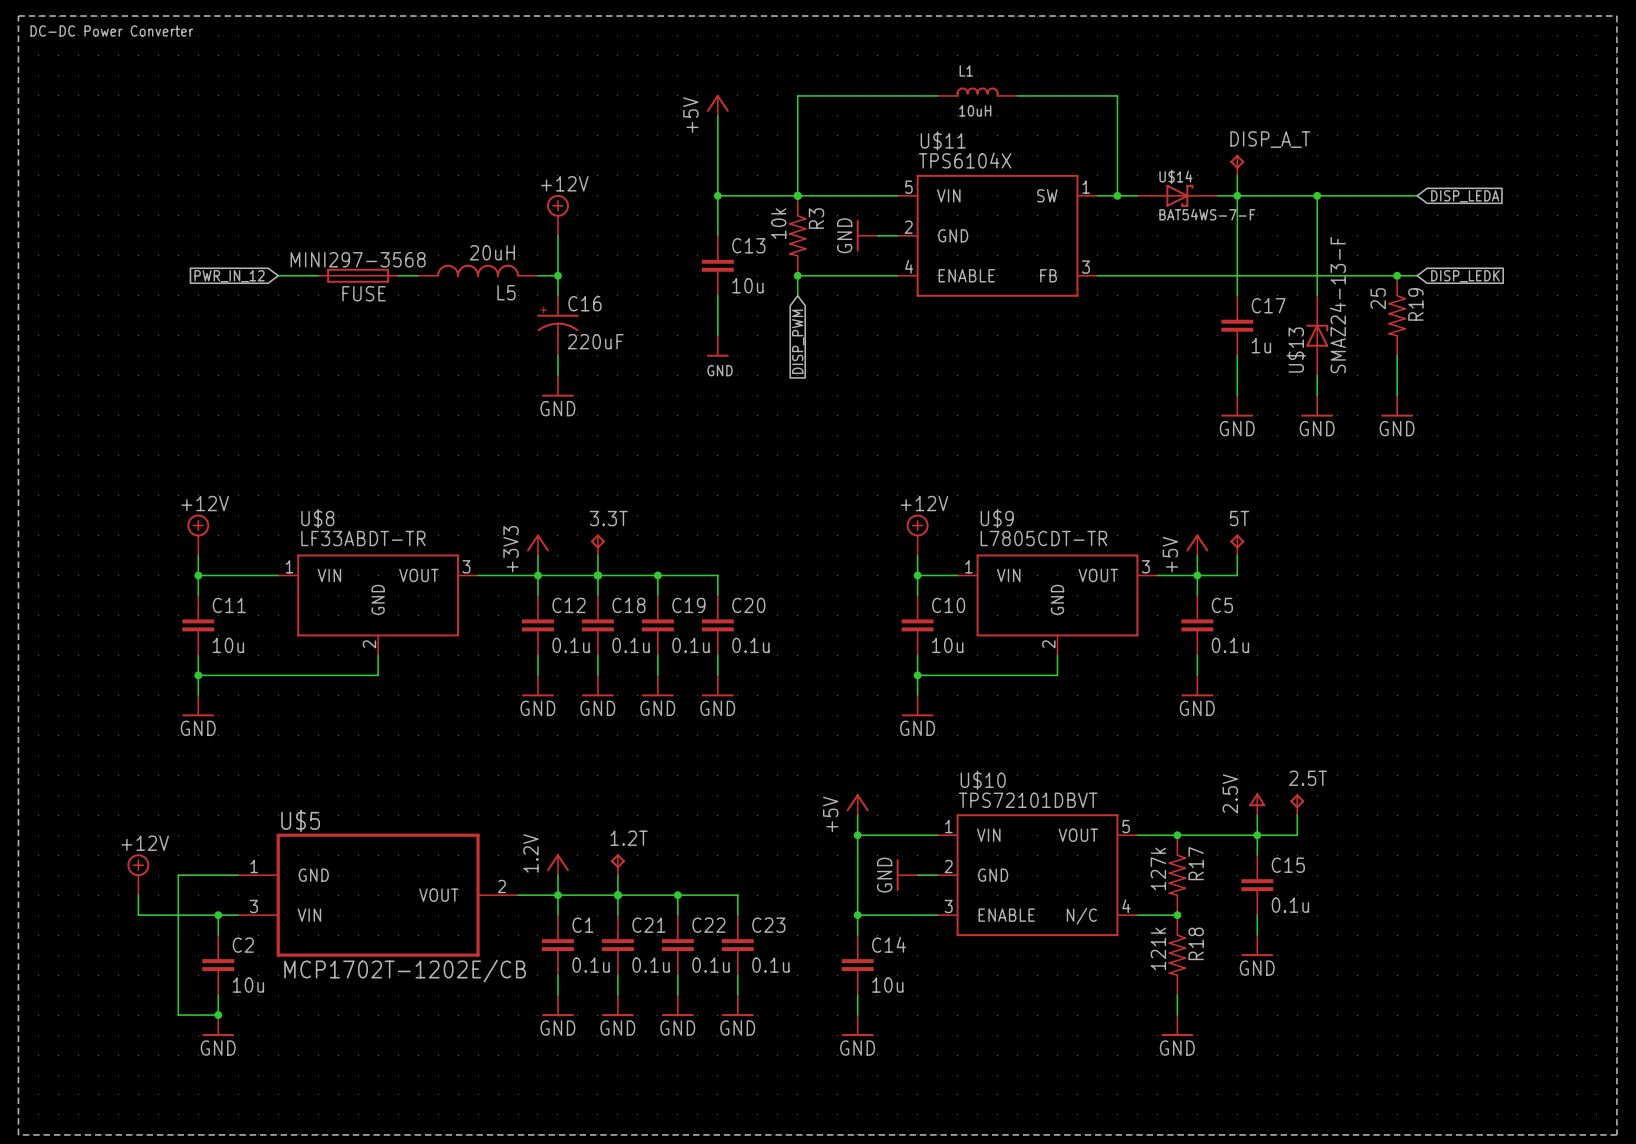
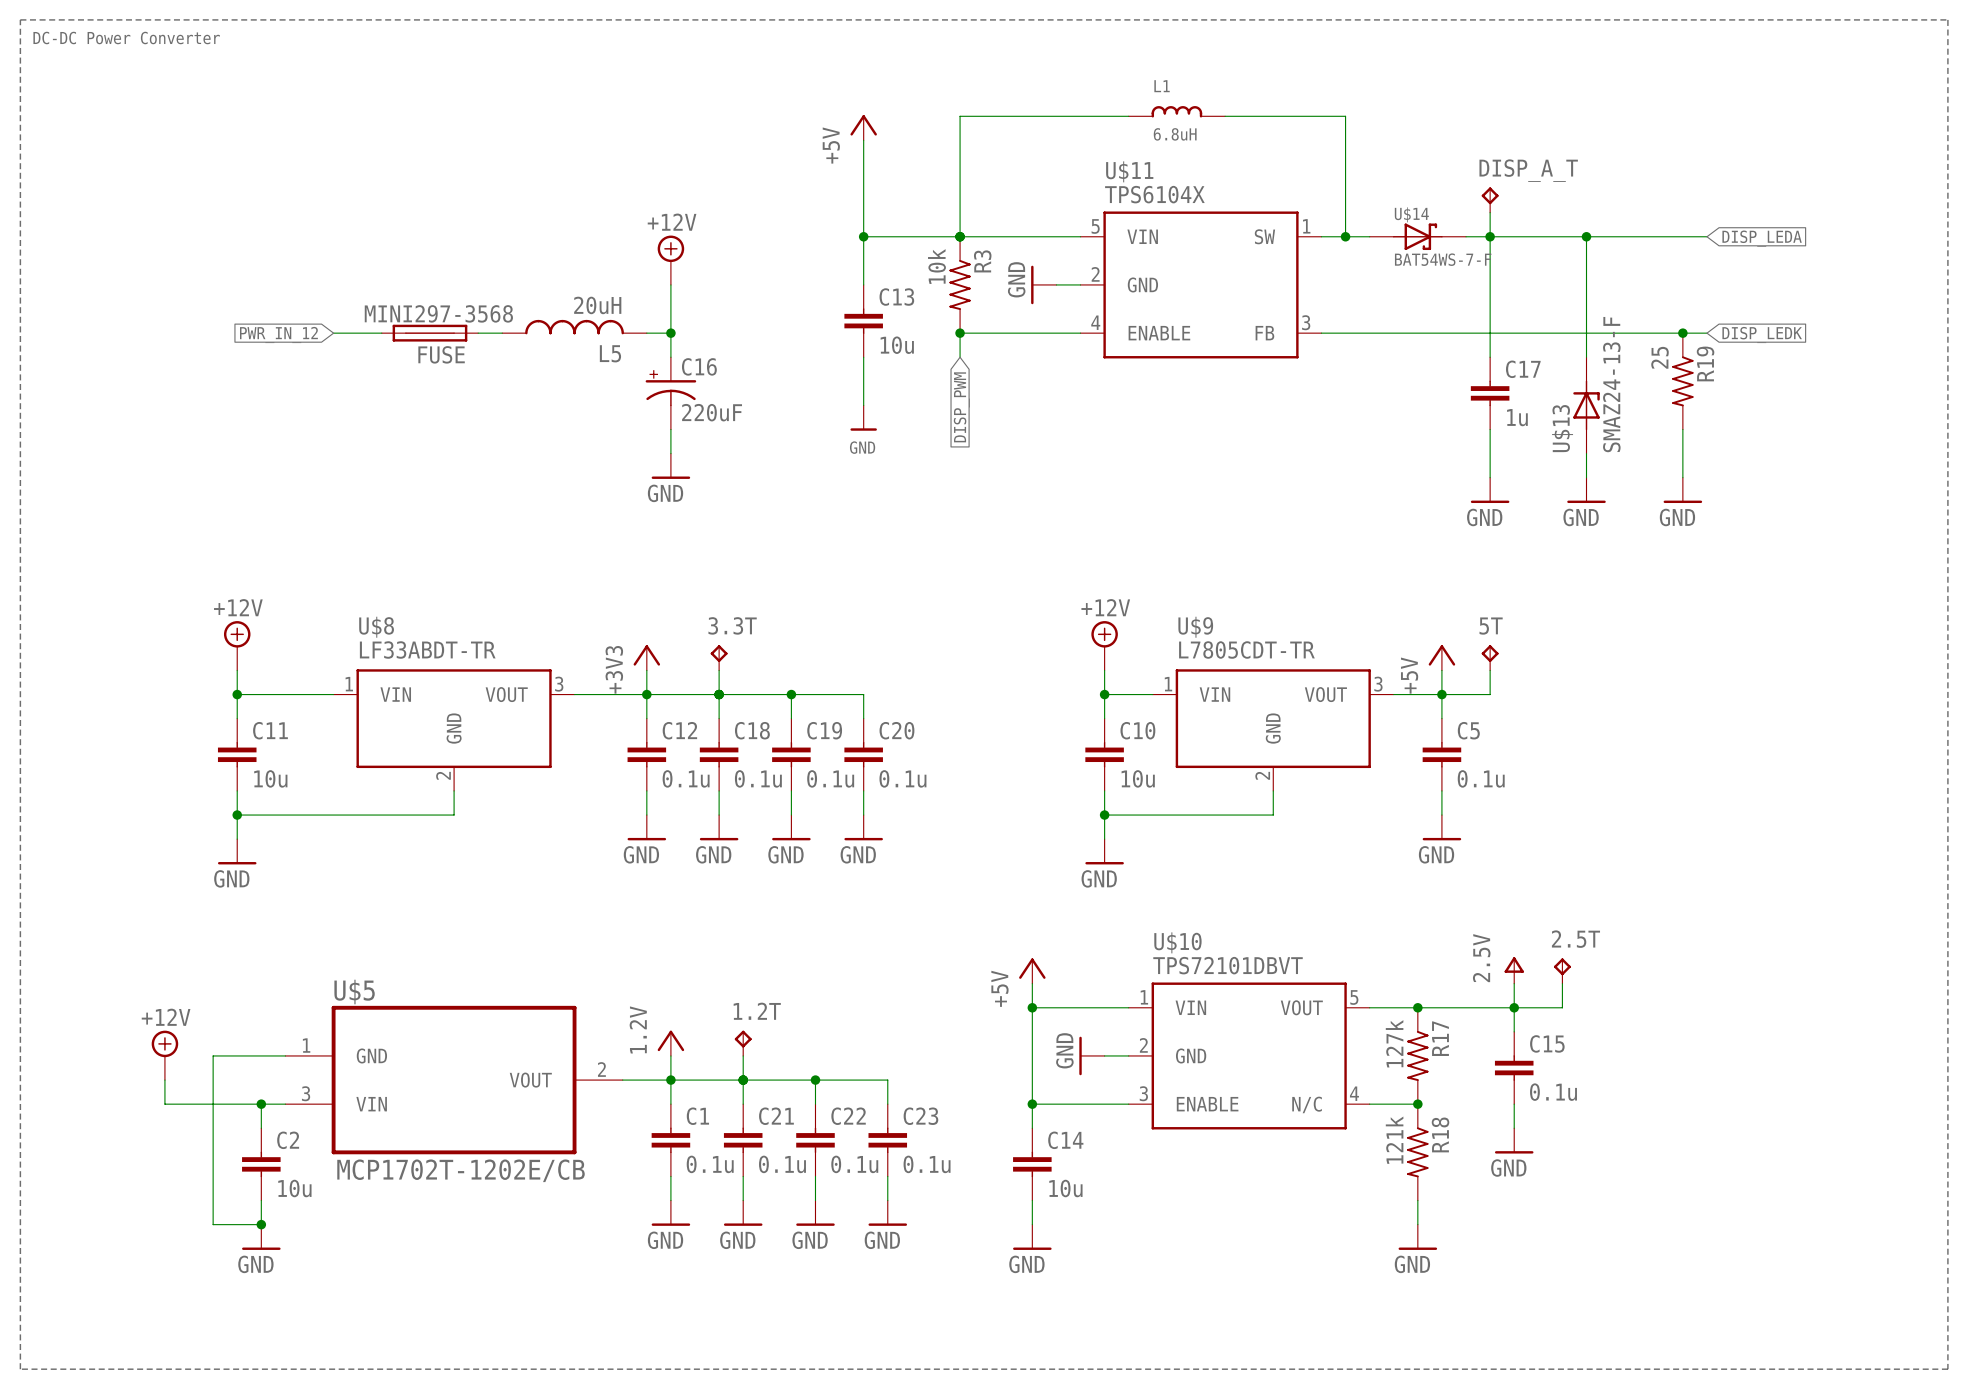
L1 value: 10uH (975, 110) -> 6.8uH (1175, 134)

